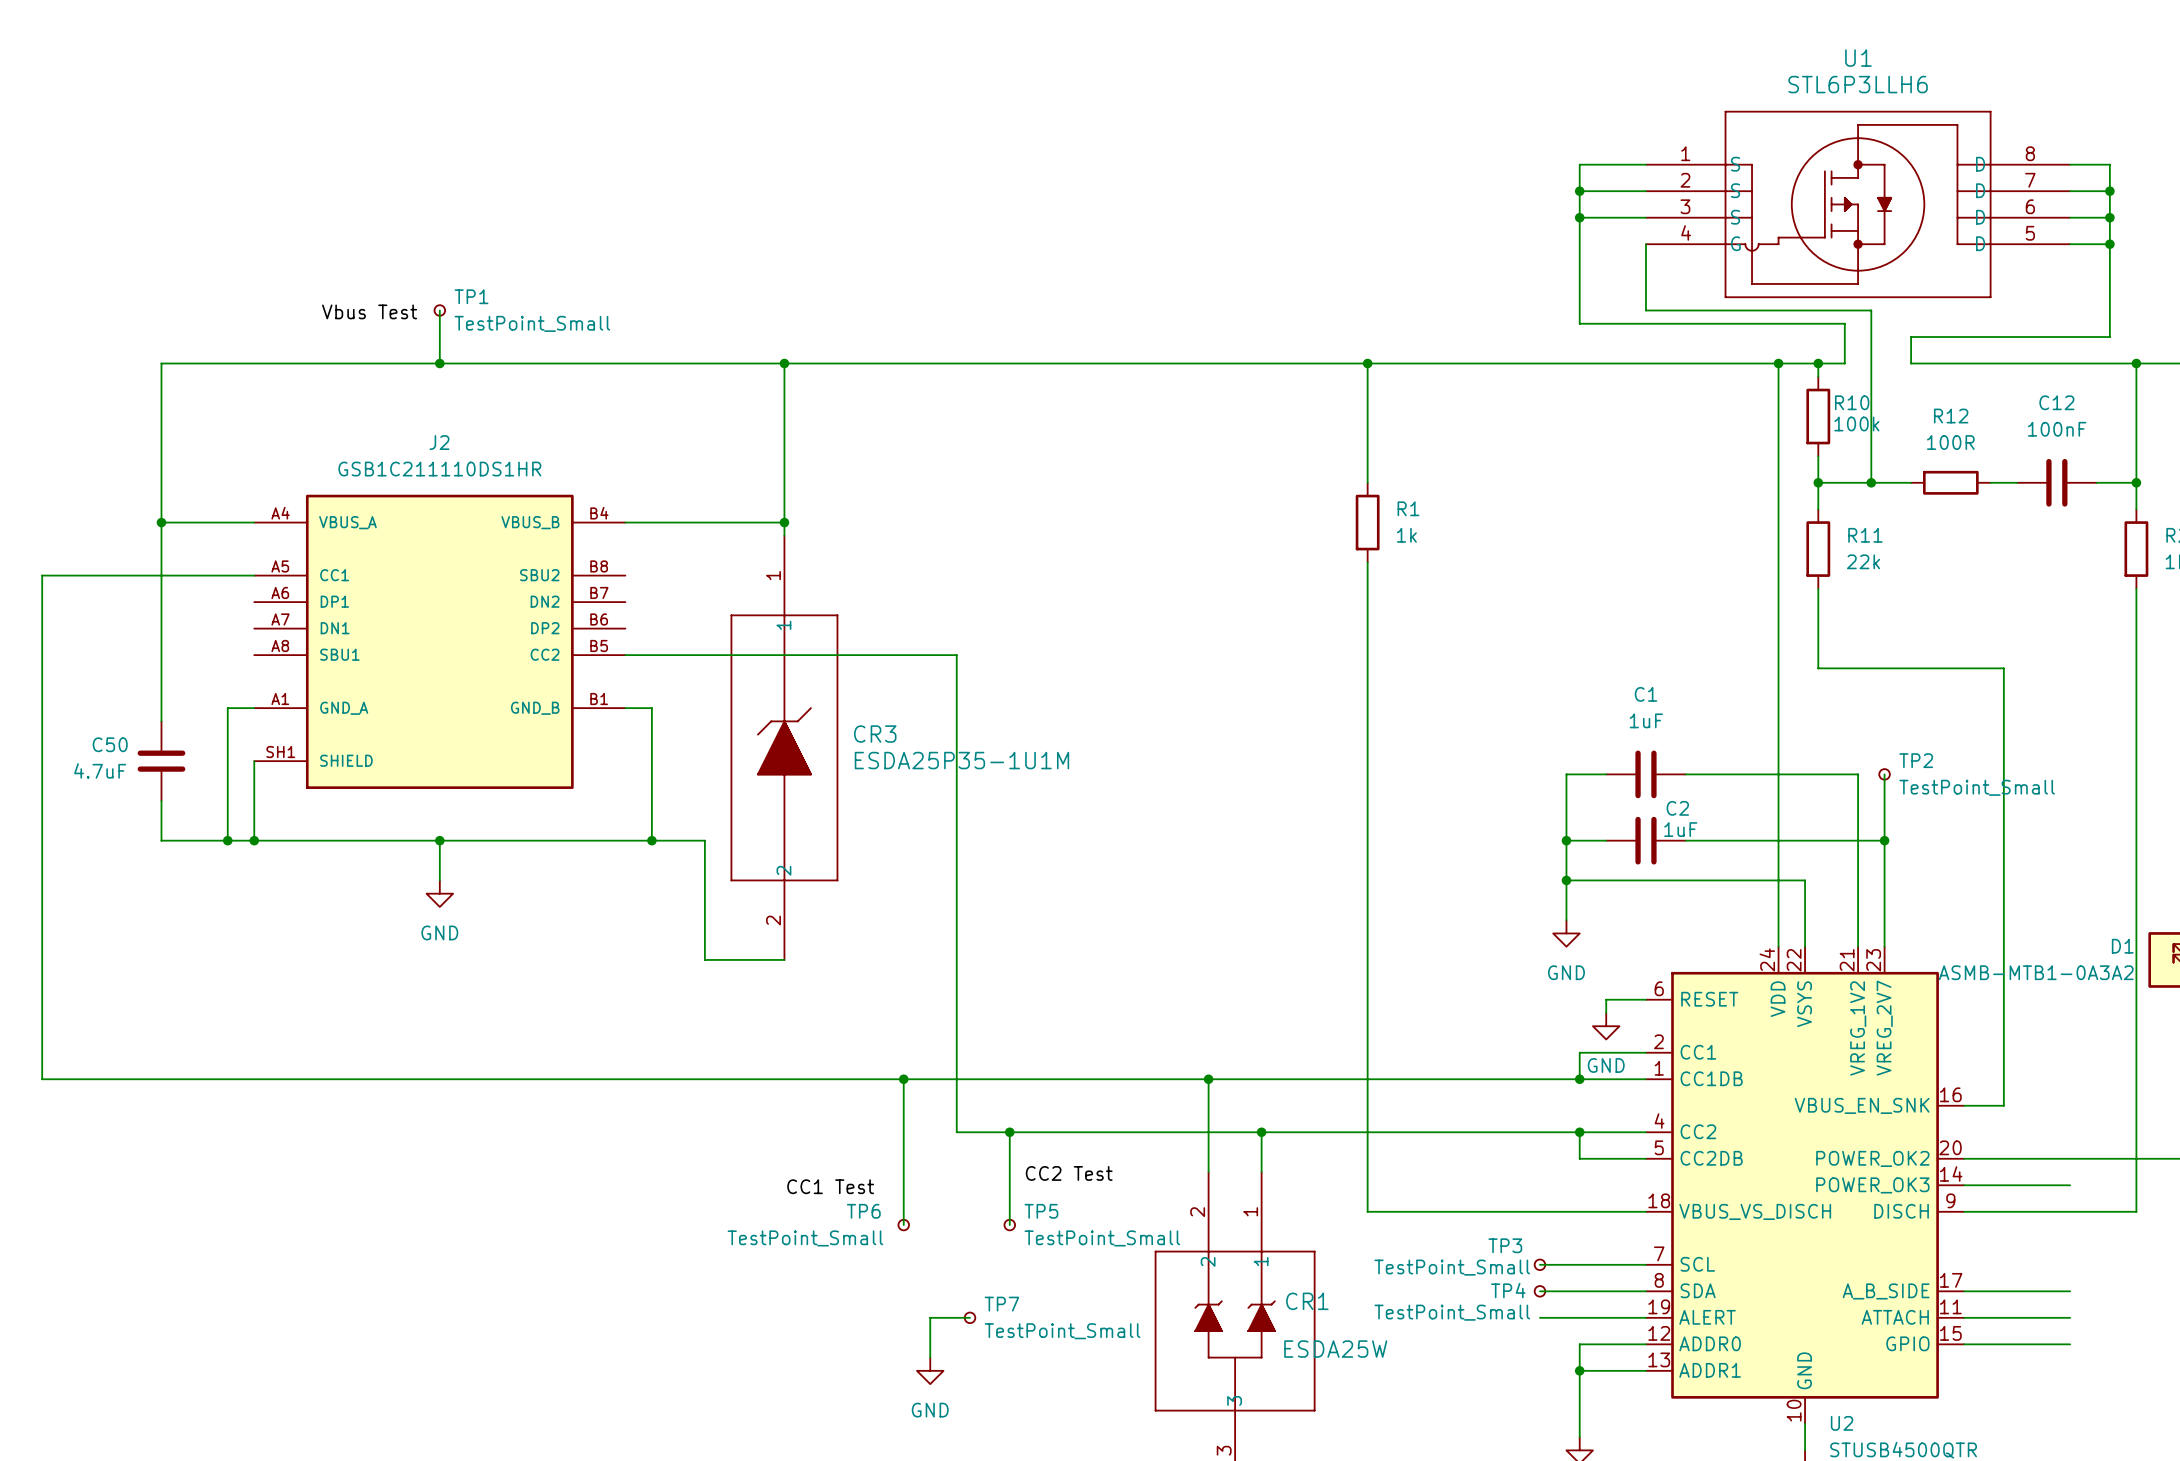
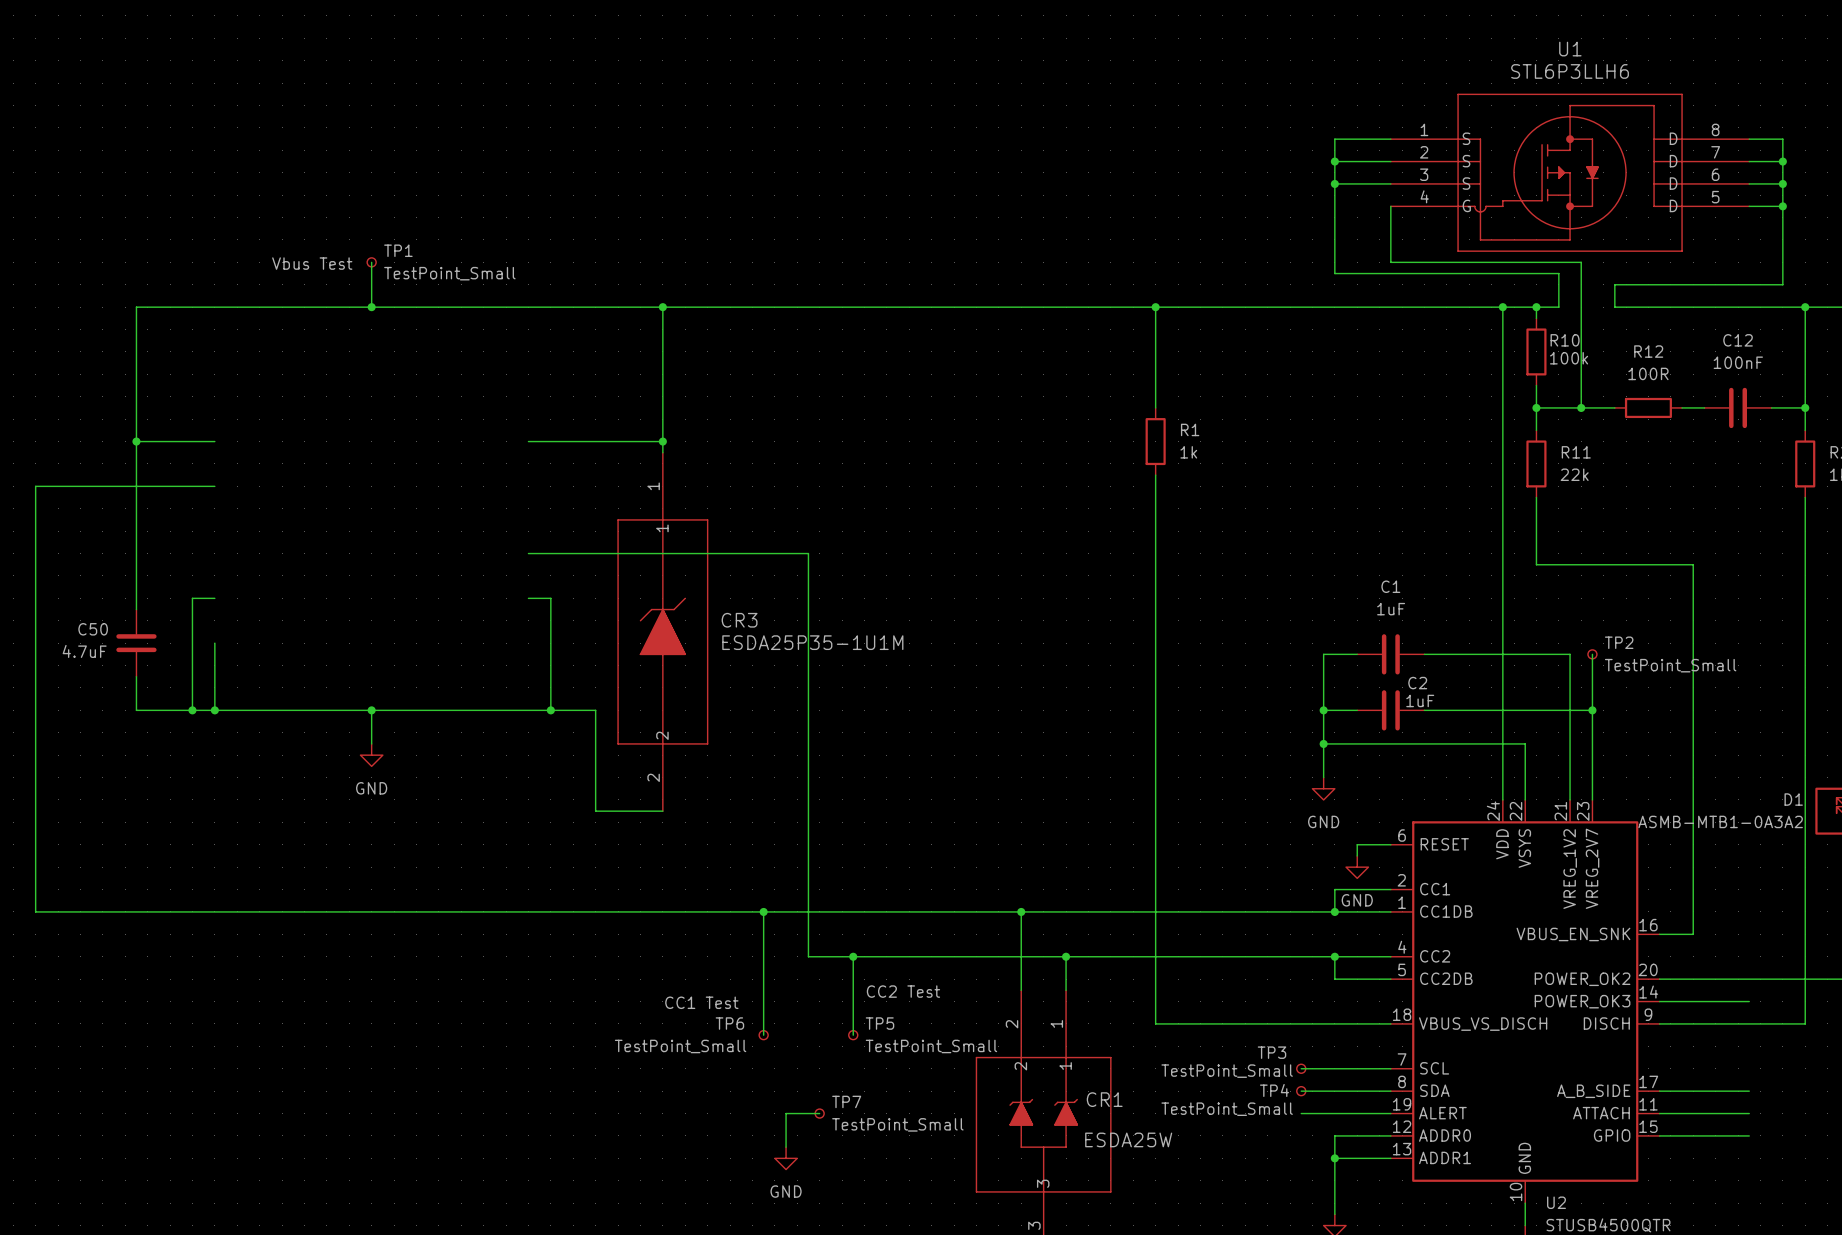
J2: GSB1C211110DS1HR (439, 641) -> none

